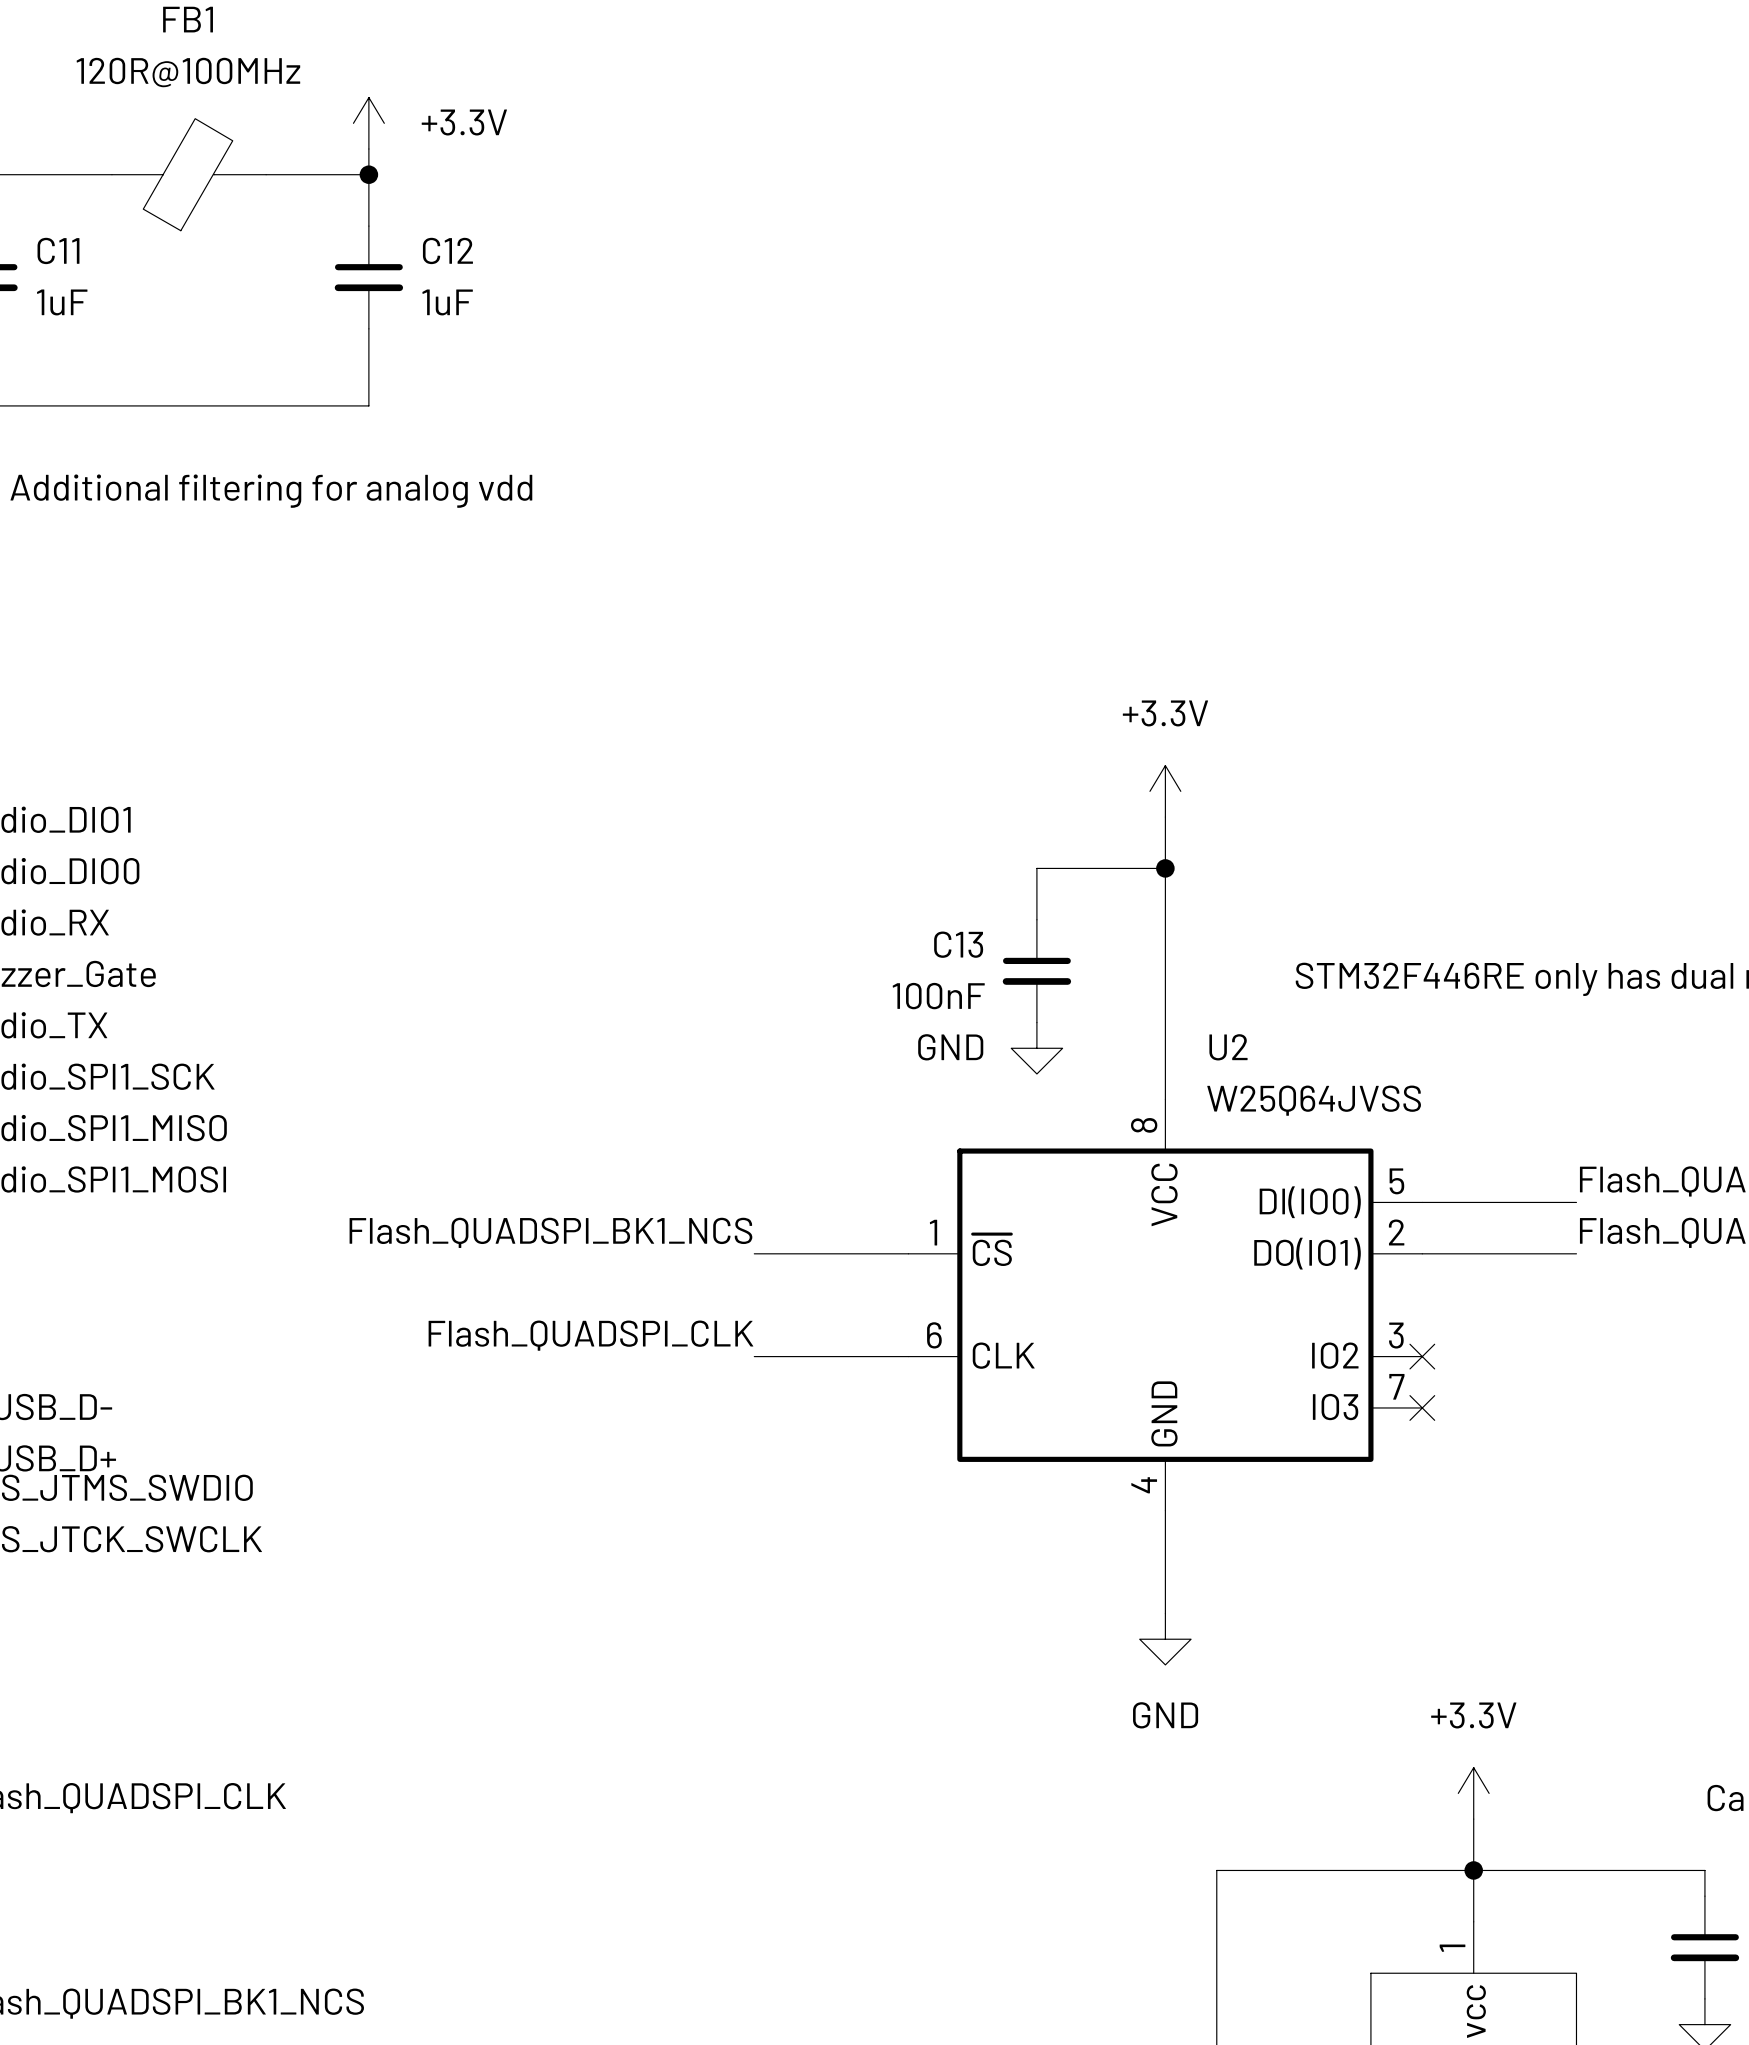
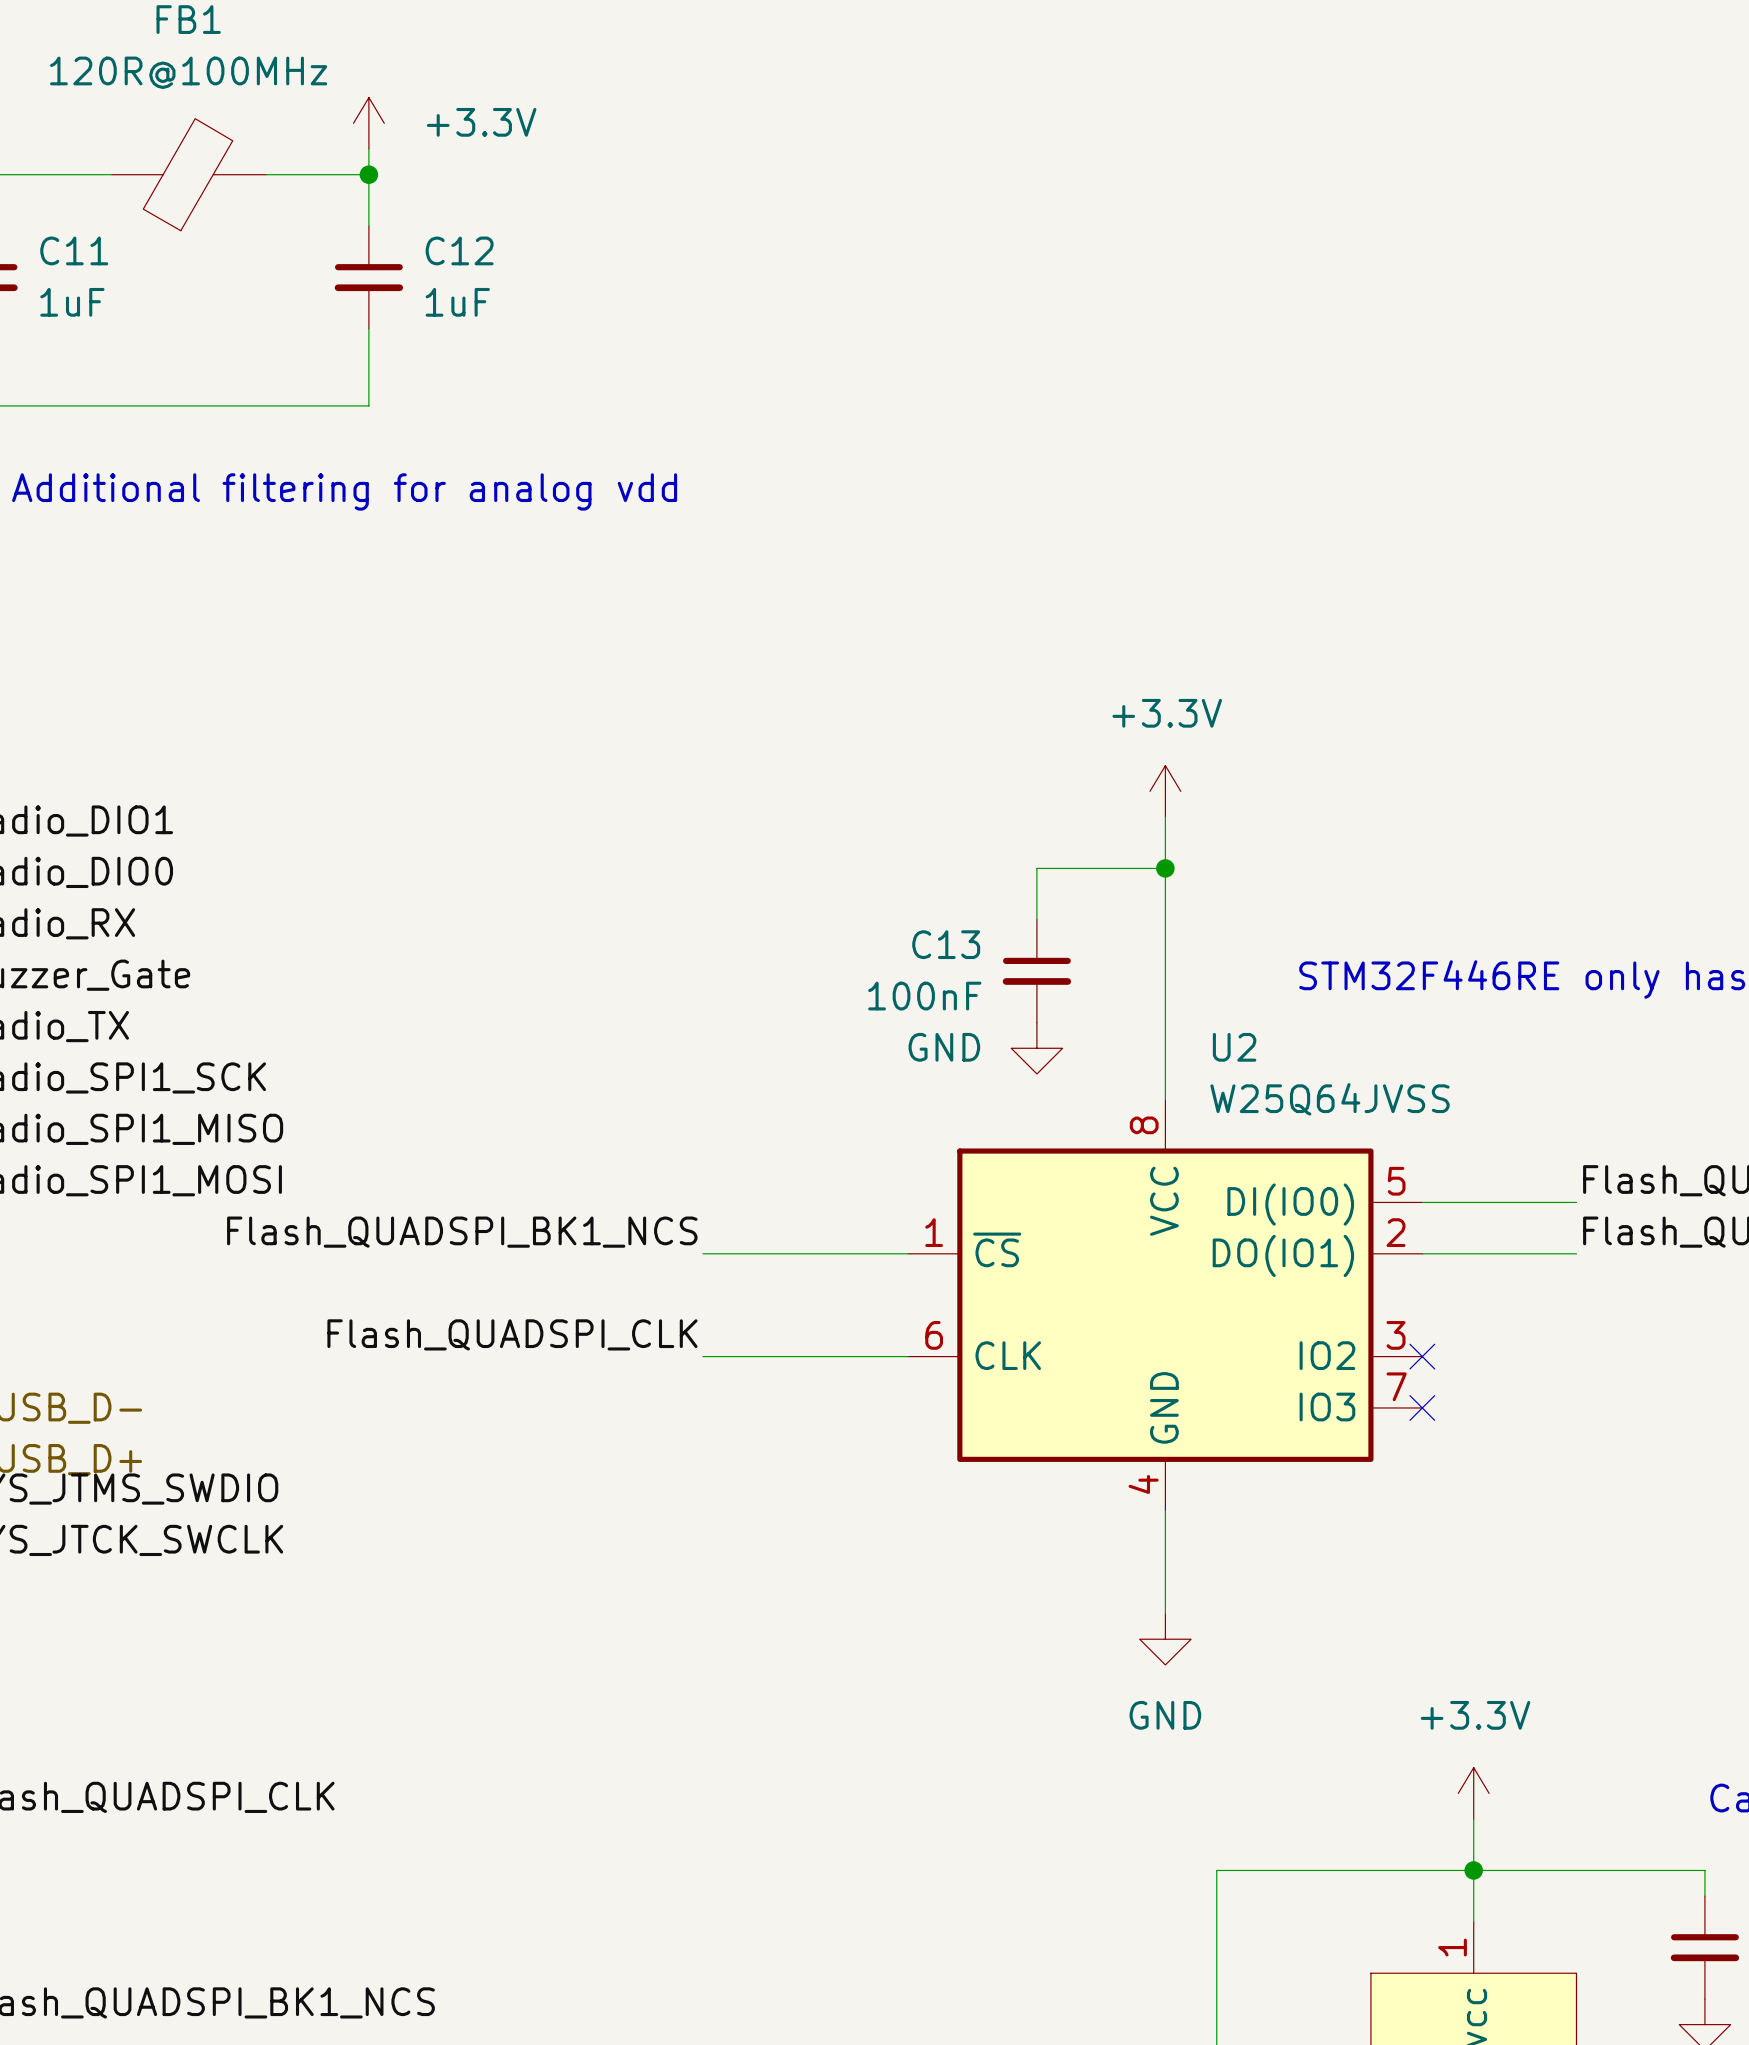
label position: Flash_QUADSPI_BK1_NCS (550, 1232) -> Flash_QUADSPI_BK1_NCS (462, 1232)
wire: none -> (702, 1253) (754, 1253)
label position: Flash_QUADSPI_CLK (590, 1335) -> Flash_QUADSPI_CLK (512, 1334)
wire: none -> (702, 1356) (754, 1356)

